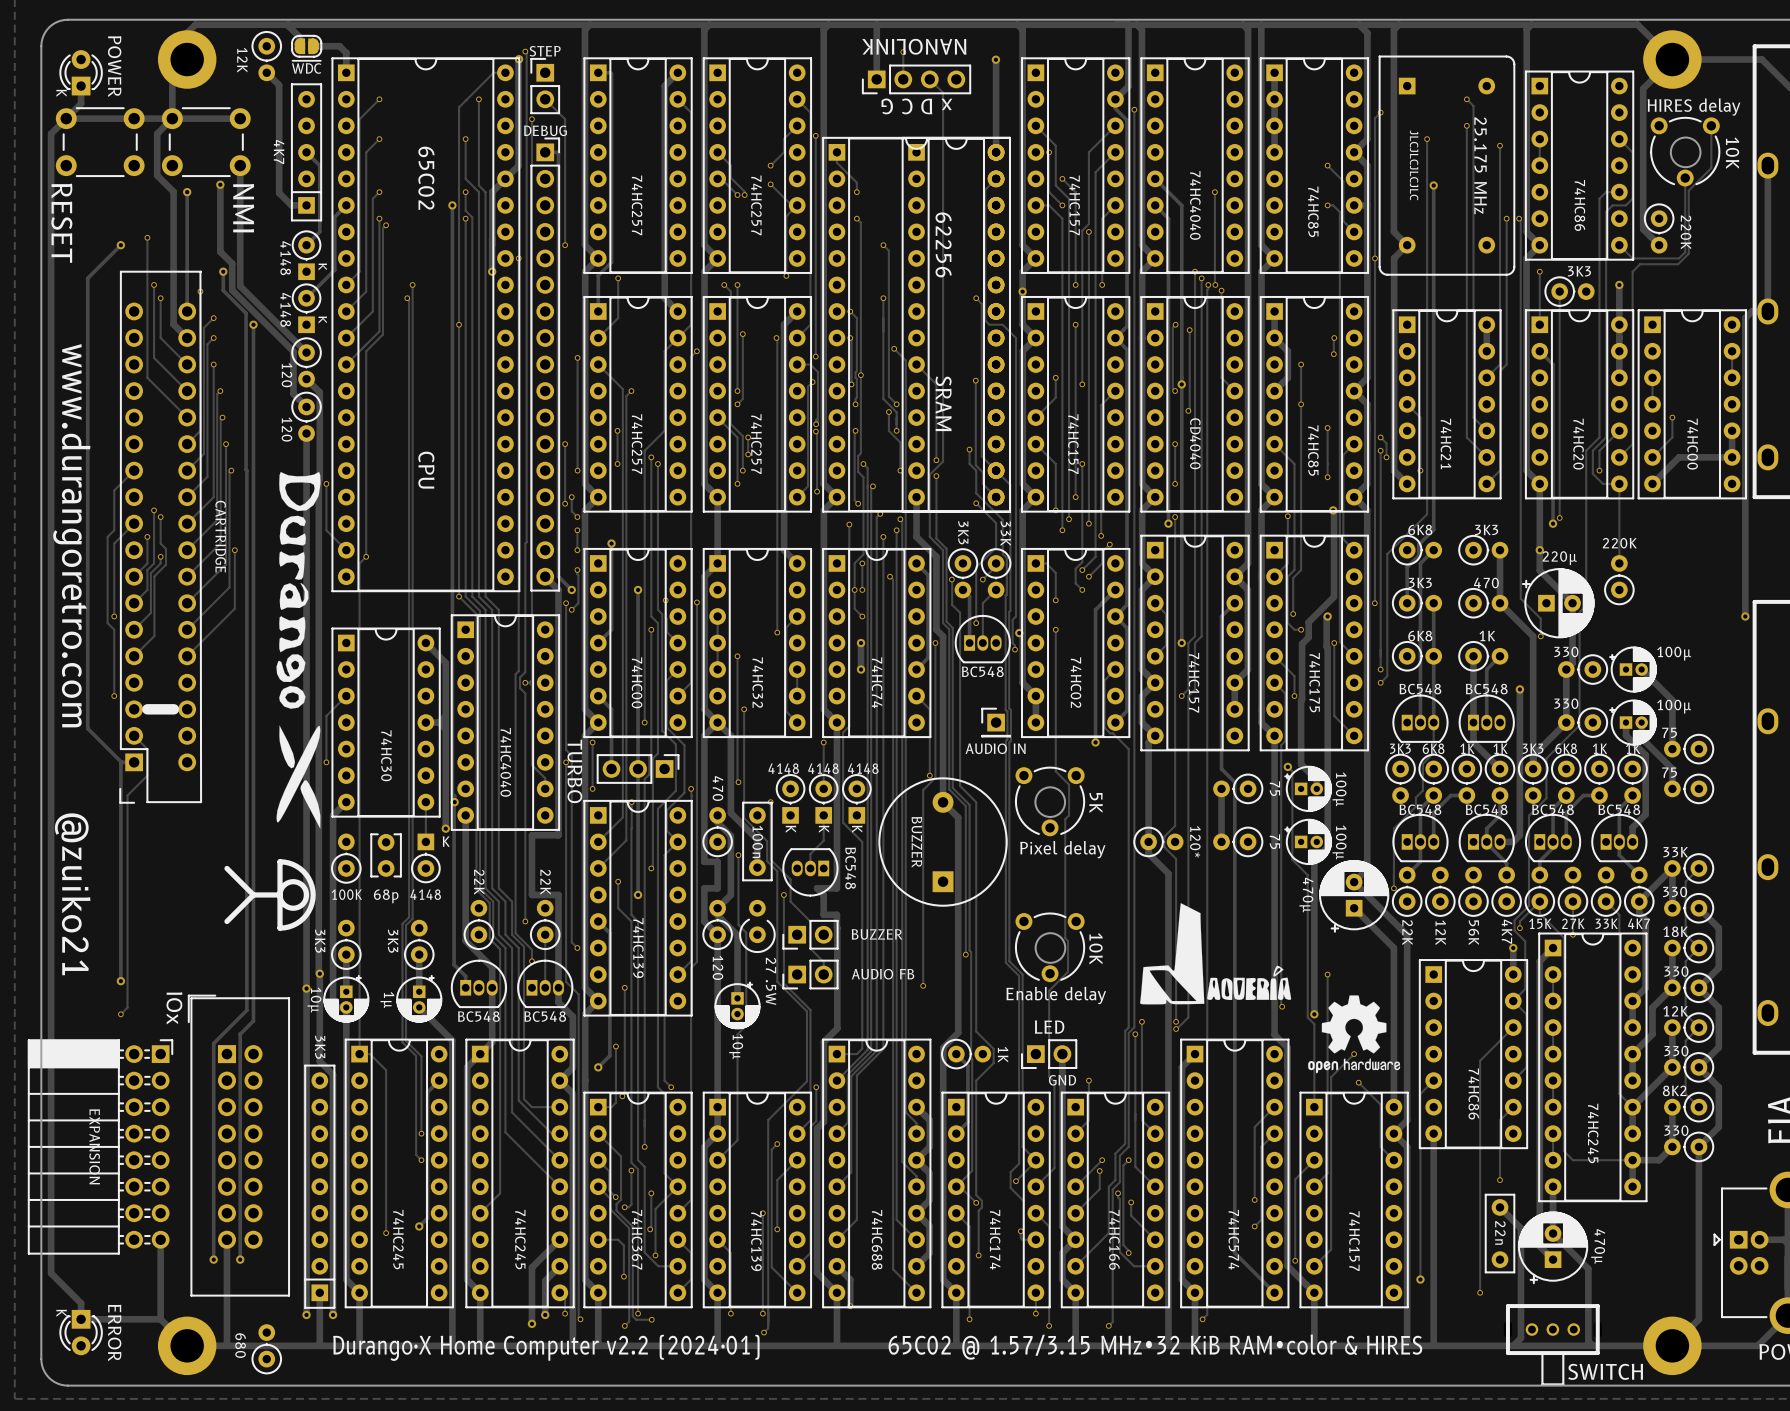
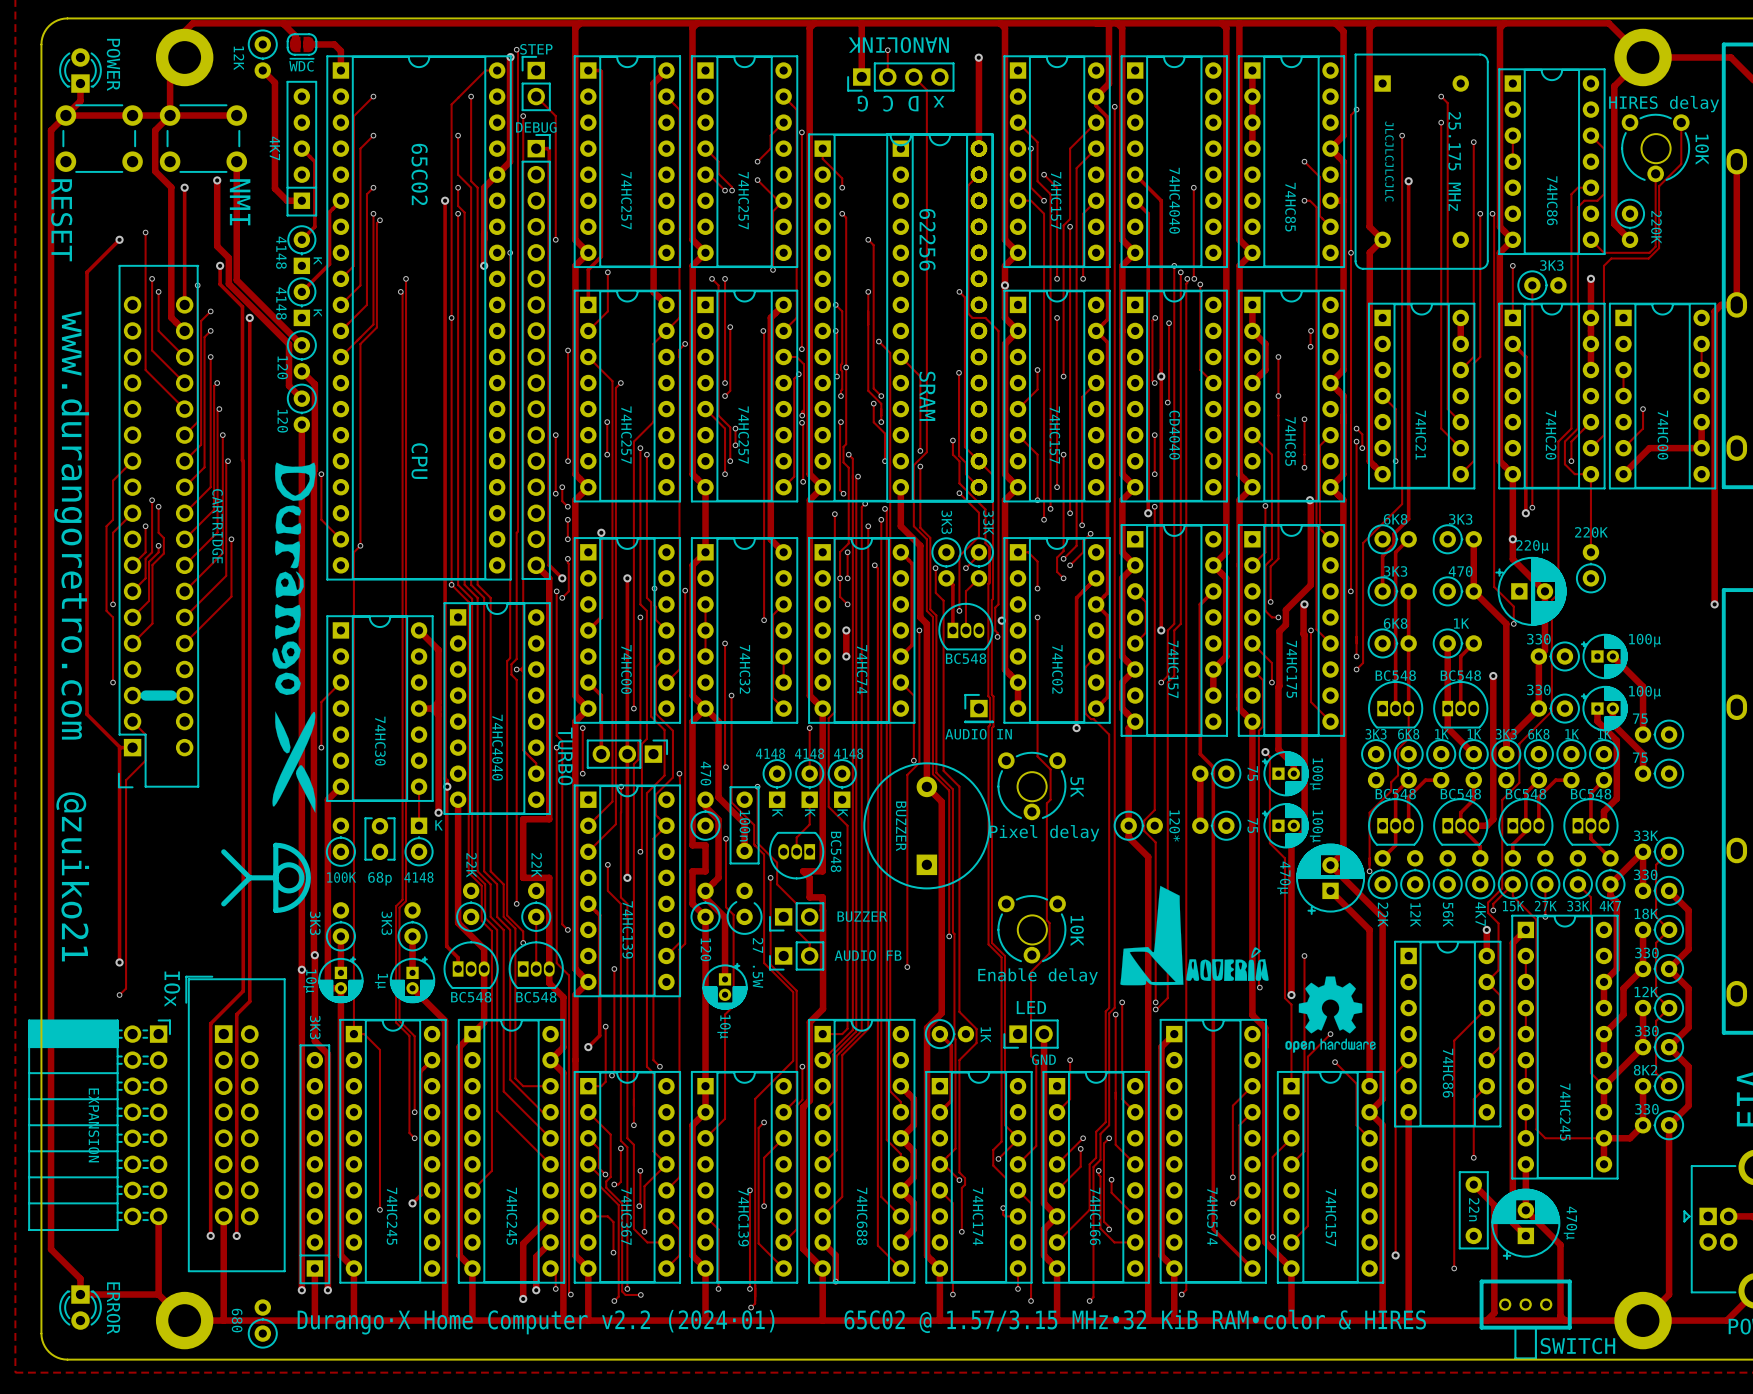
text: K (61, 93) -> none
text: K (61, 1313) -> none

